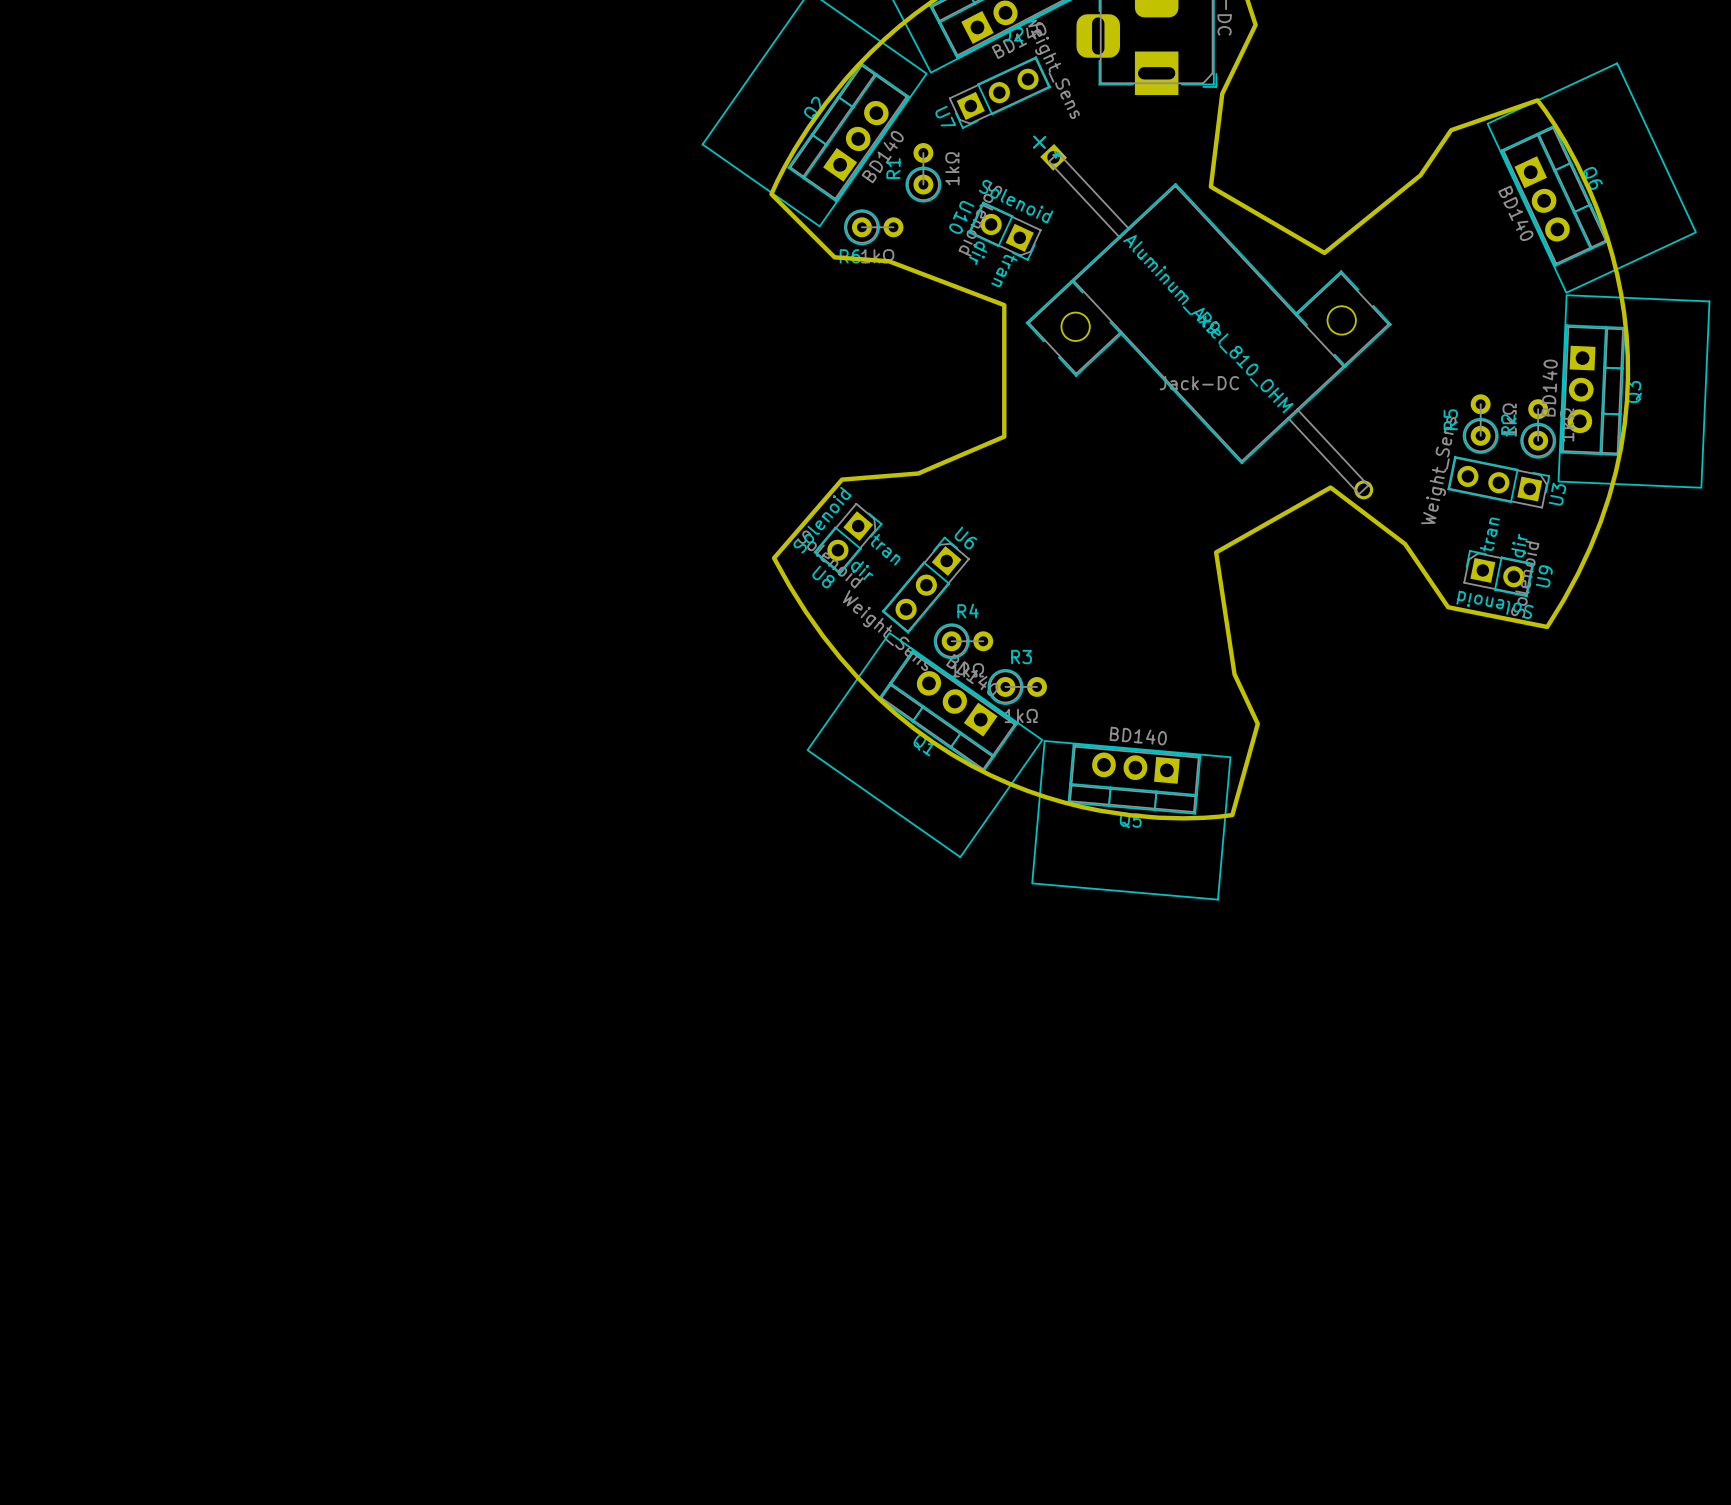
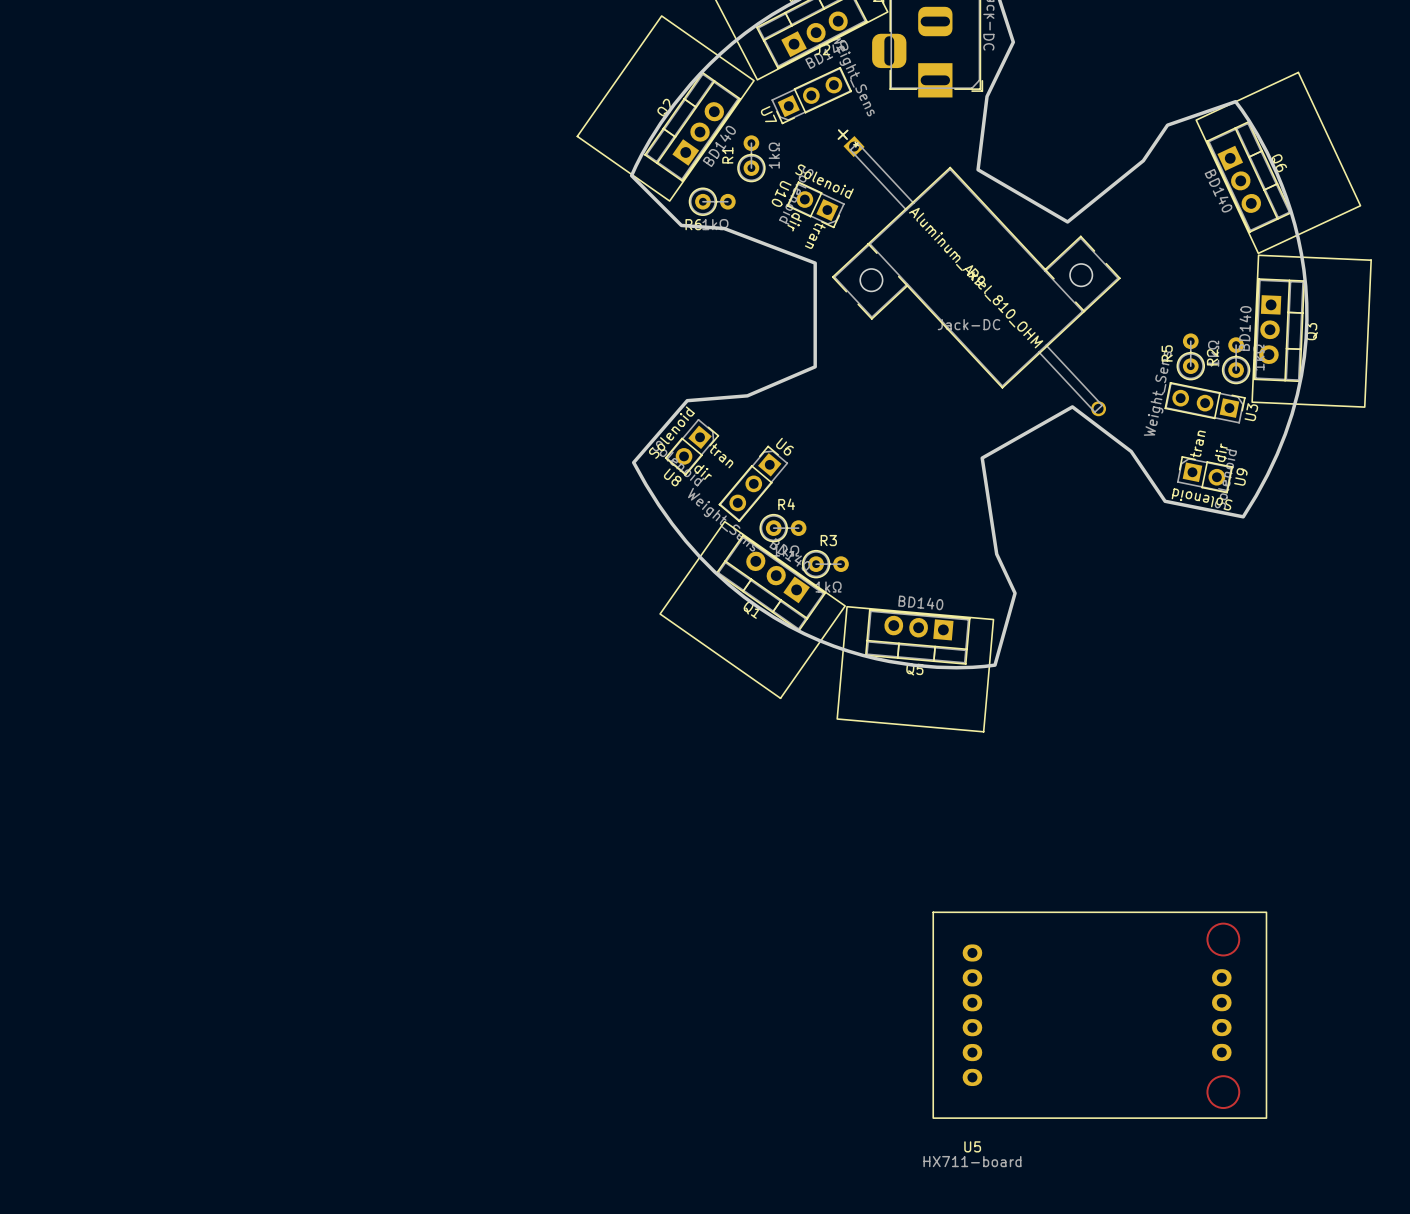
U5: none -> HX711-board (1099, 1015)

